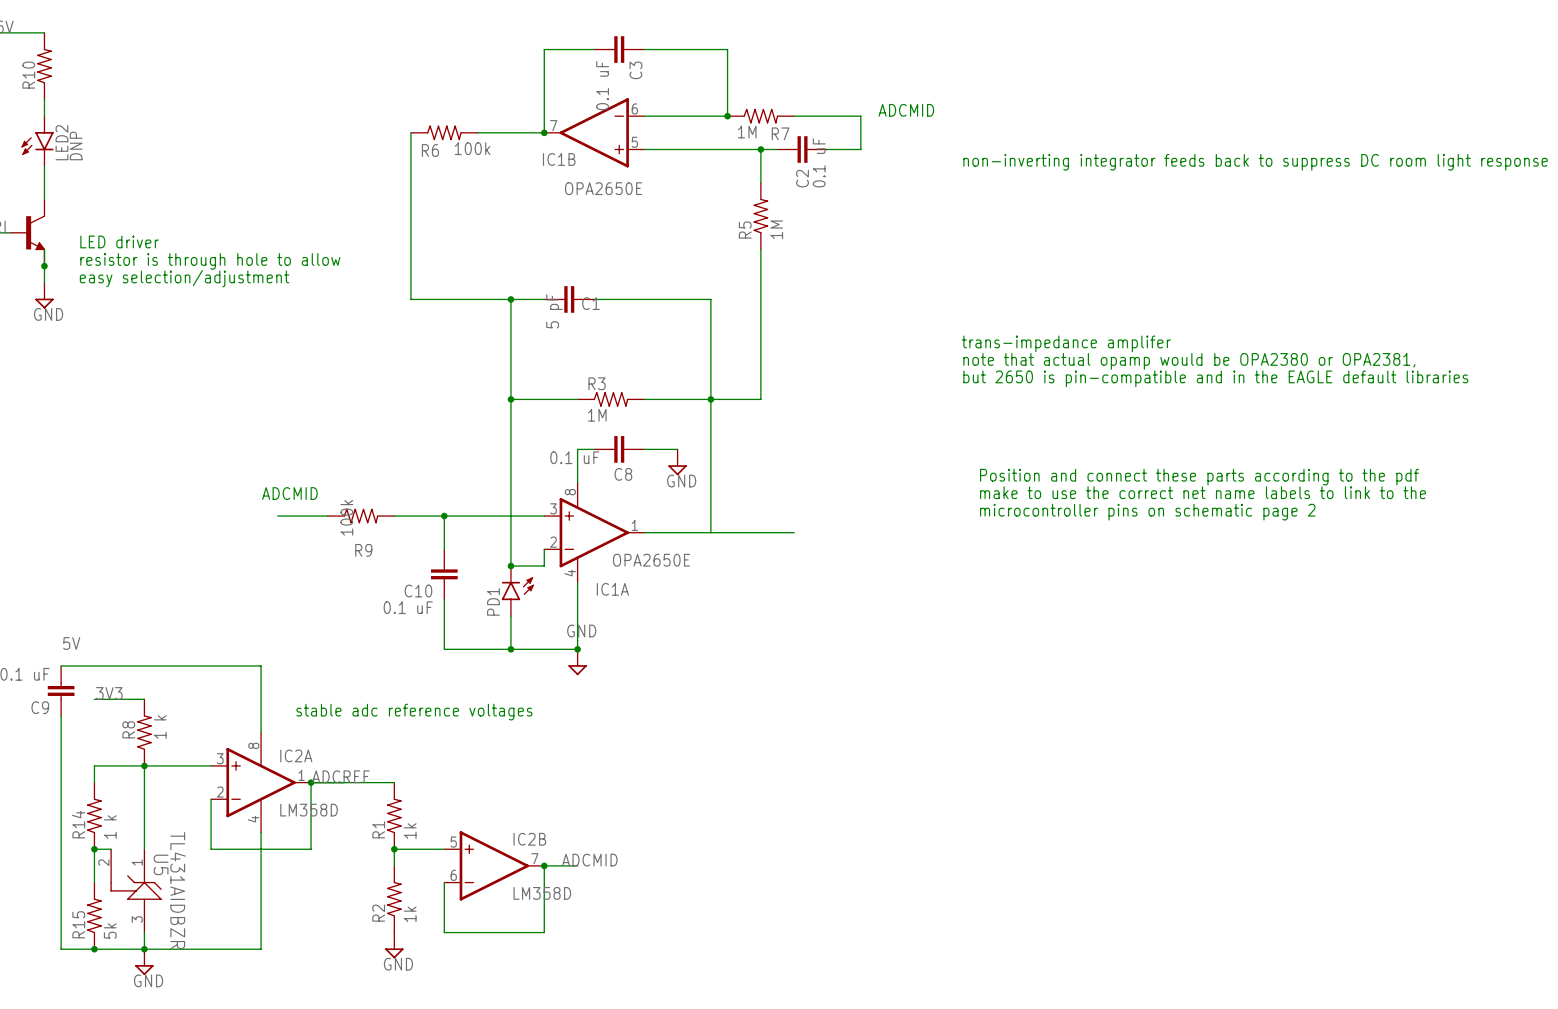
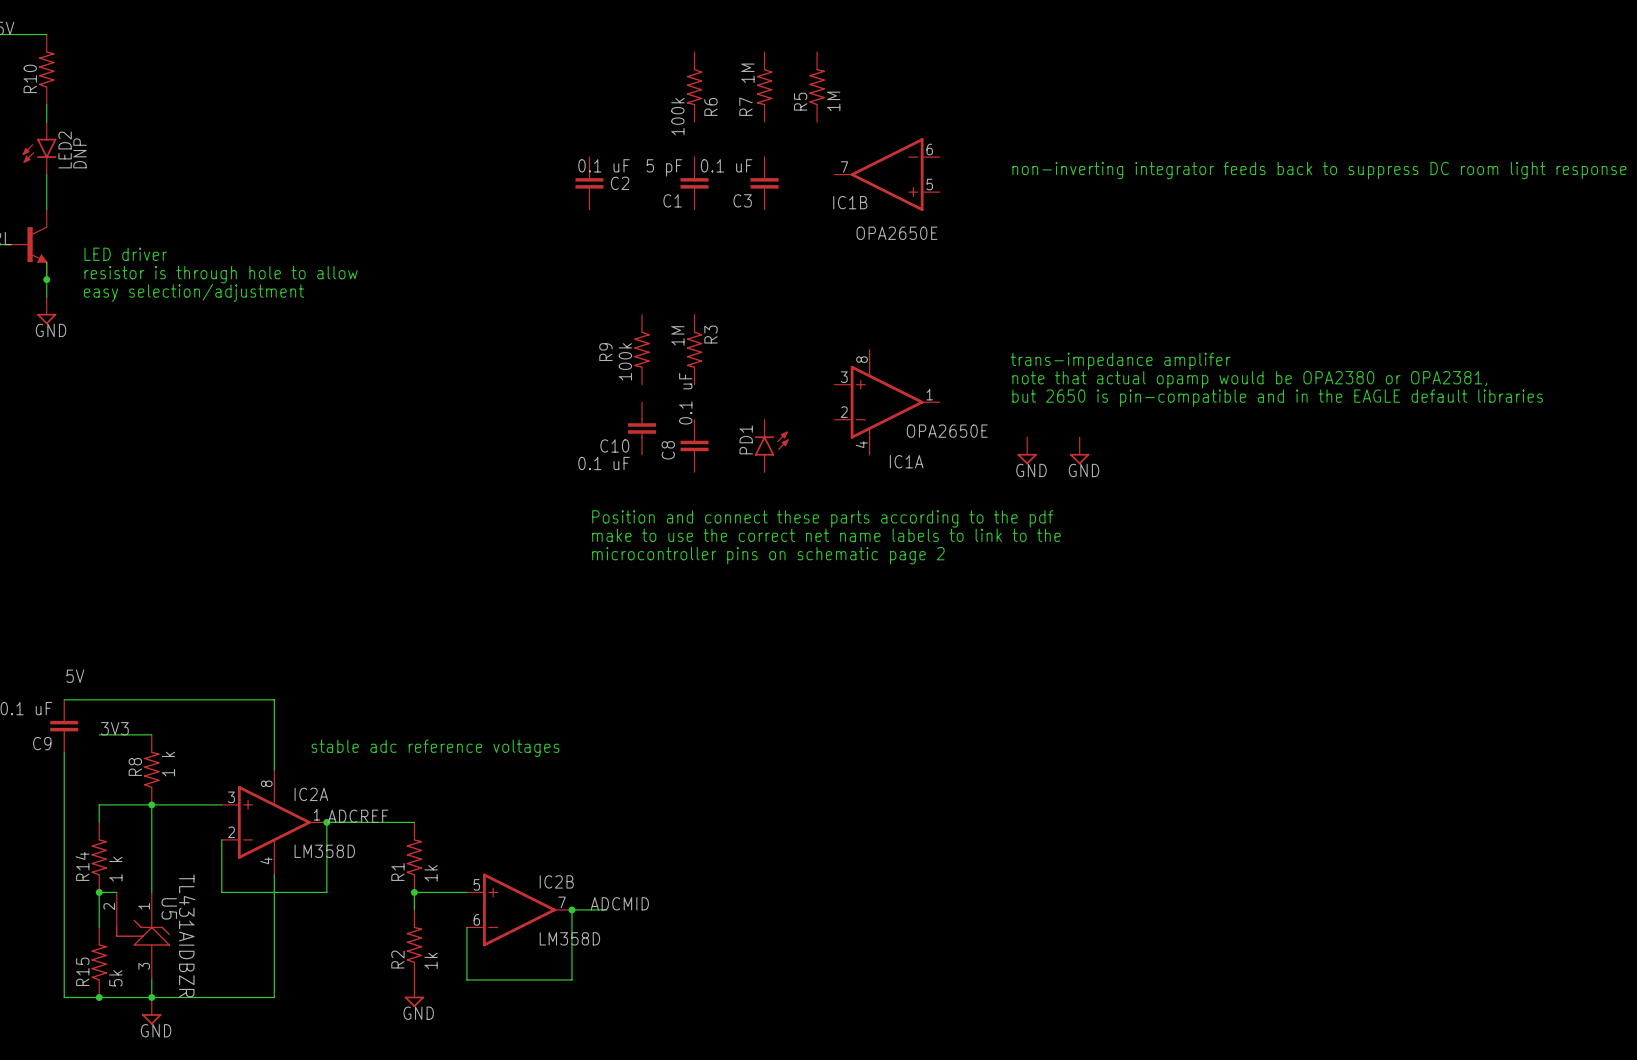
wire: (594, 49) (544, 49) (544, 132) (477, 132) -> none
C3 rotation: 0° (619, 49) -> 90° clockwise (764, 183)
C3 position: (619, 49) -> (764, 183)
wire: (644, 49) (727, 49) (727, 116) (644, 116) -> none
text: ADCMID (906, 110) -> none
junction: (727, 116) -> none
R7 rotation: 0° (760, 116) -> 90° clockwise (764, 87)
R7 position: (760, 116) -> (764, 87)
wire: (794, 116) (860, 116) (860, 149) (827, 149) -> none
wire: (411, 132) (411, 299) (544, 299) -> none
R6 rotation: 0° (444, 132) -> 90° clockwise (694, 87)
R6 position: (444, 132) -> (694, 87)
junction: (544, 132) -> none
IC1B position: (594, 132) -> (887, 174)
wire: (644, 149) (777, 149) -> none
wire: (760, 149) (760, 182) -> none
junction: (760, 149) -> none
C2 rotation: 0° (802, 149) -> 90° clockwise (589, 183)
C2 position: (802, 149) -> (589, 183)
R6 name position: R6 (430, 150) -> R6 (710, 106)
C2 value position: 0.1 uF (819, 162) -> 0.1 uF (604, 165)
C2 name position: C2 (802, 178) -> C2 (620, 183)
R5 position: (760, 216) -> (817, 87)
wire: (760, 249) (760, 399) (644, 399) -> none
wire: (510, 299) (510, 566) (544, 566) (544, 549) -> none
junction: (510, 299) -> none
C1 rotation: 0° (569, 299) -> 90° clockwise (694, 183)
C1 position: (569, 299) -> (694, 183)
wire: (594, 299) (710, 299) (710, 532) -> none
C1 name position: C1 (590, 303) -> C1 (672, 200)
C1 value position: 5 pF (554, 311) -> 5 pF (664, 167)
wire: (510, 399) (577, 399) -> none
junction: (510, 399) -> none
R3 rotation: 0° (610, 399) -> 90° clockwise (694, 349)
R3 position: (610, 399) -> (694, 349)
junction: (710, 399) -> none
power symbol: none -> GND (1027, 450)
power symbol: none -> GND (1079, 450)
wire: (594, 449) (577, 449) (577, 482) -> none
C8 rotation: 0° (619, 449) -> 90° clockwise (694, 445)
C8 position: (619, 449) -> (694, 445)
wire: (644, 449) (677, 449) -> none
power symbol: GND (677, 462) -> none
text: Position and connect these parts according to the pdf (1199, 477) -> none
text: make to use the correct net name labels to link to the (1203, 492) -> none
text: ADCMID (289, 493) -> none
text: none -> Position and connect these parts according to the pdf (822, 518)
text: none -> make to use the correct net name labels to link to the (826, 535)
text: microcontroller pins on schematic page 2 (1147, 512) -> none
wire: (277, 516) (327, 516) -> none
R9 rotation: 0° (361, 516) -> 90° clockwise (641, 349)
R9 position: (361, 516) -> (641, 349)
wire: (394, 516) (544, 516) -> none
wire: (444, 516) (444, 549) -> none
junction: (444, 516) -> none
R9 value position: 100k (346, 517) -> 100k (625, 361)
text: none -> microcontroller pins on schematic page 2 (768, 555)
IC1A position: (594, 532) -> (887, 402)
wire: (644, 532) (794, 532) -> none
junction: (510, 566) -> none
C10 position: (444, 574) -> (641, 428)
wire: (577, 582) (577, 649) (444, 649) (444, 599) -> none
PD1 position: (517, 591) -> (771, 445)
PD1 name position: PD1 (493, 601) -> PD1 (746, 439)
wire: (510, 616) (510, 649) -> none
junction: (510, 649) -> none
junction: (577, 649) -> none
power symbol: GND (577, 662) -> none

